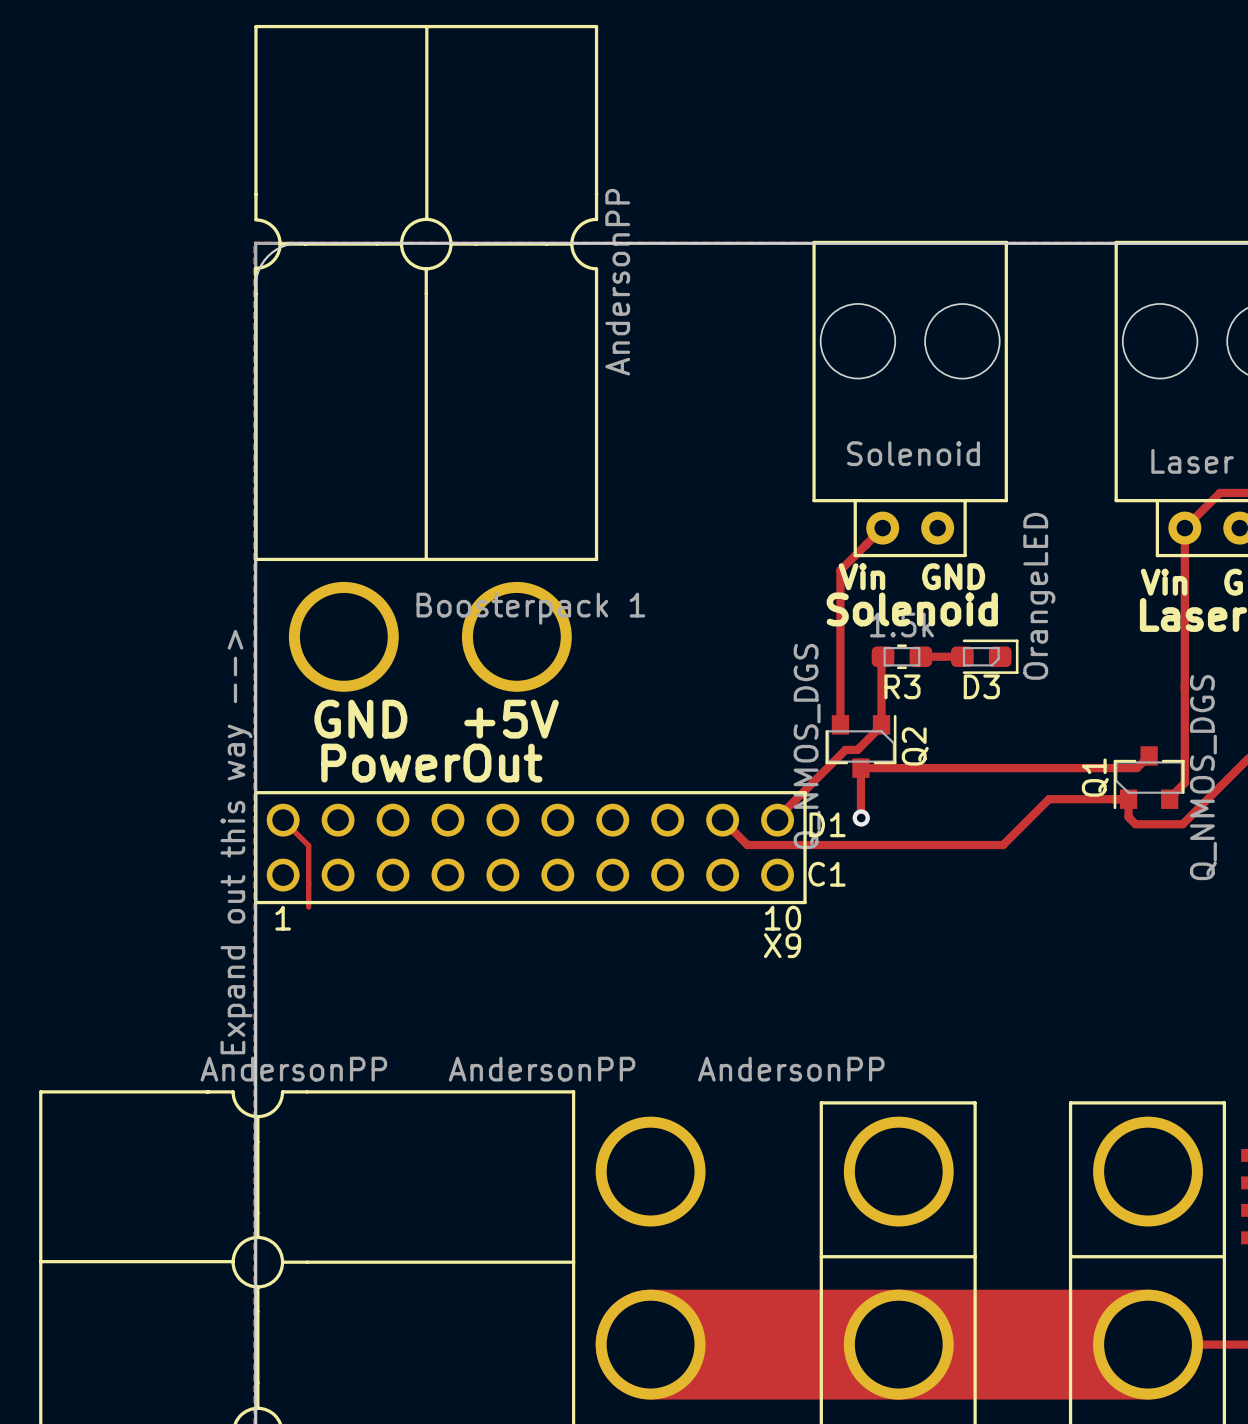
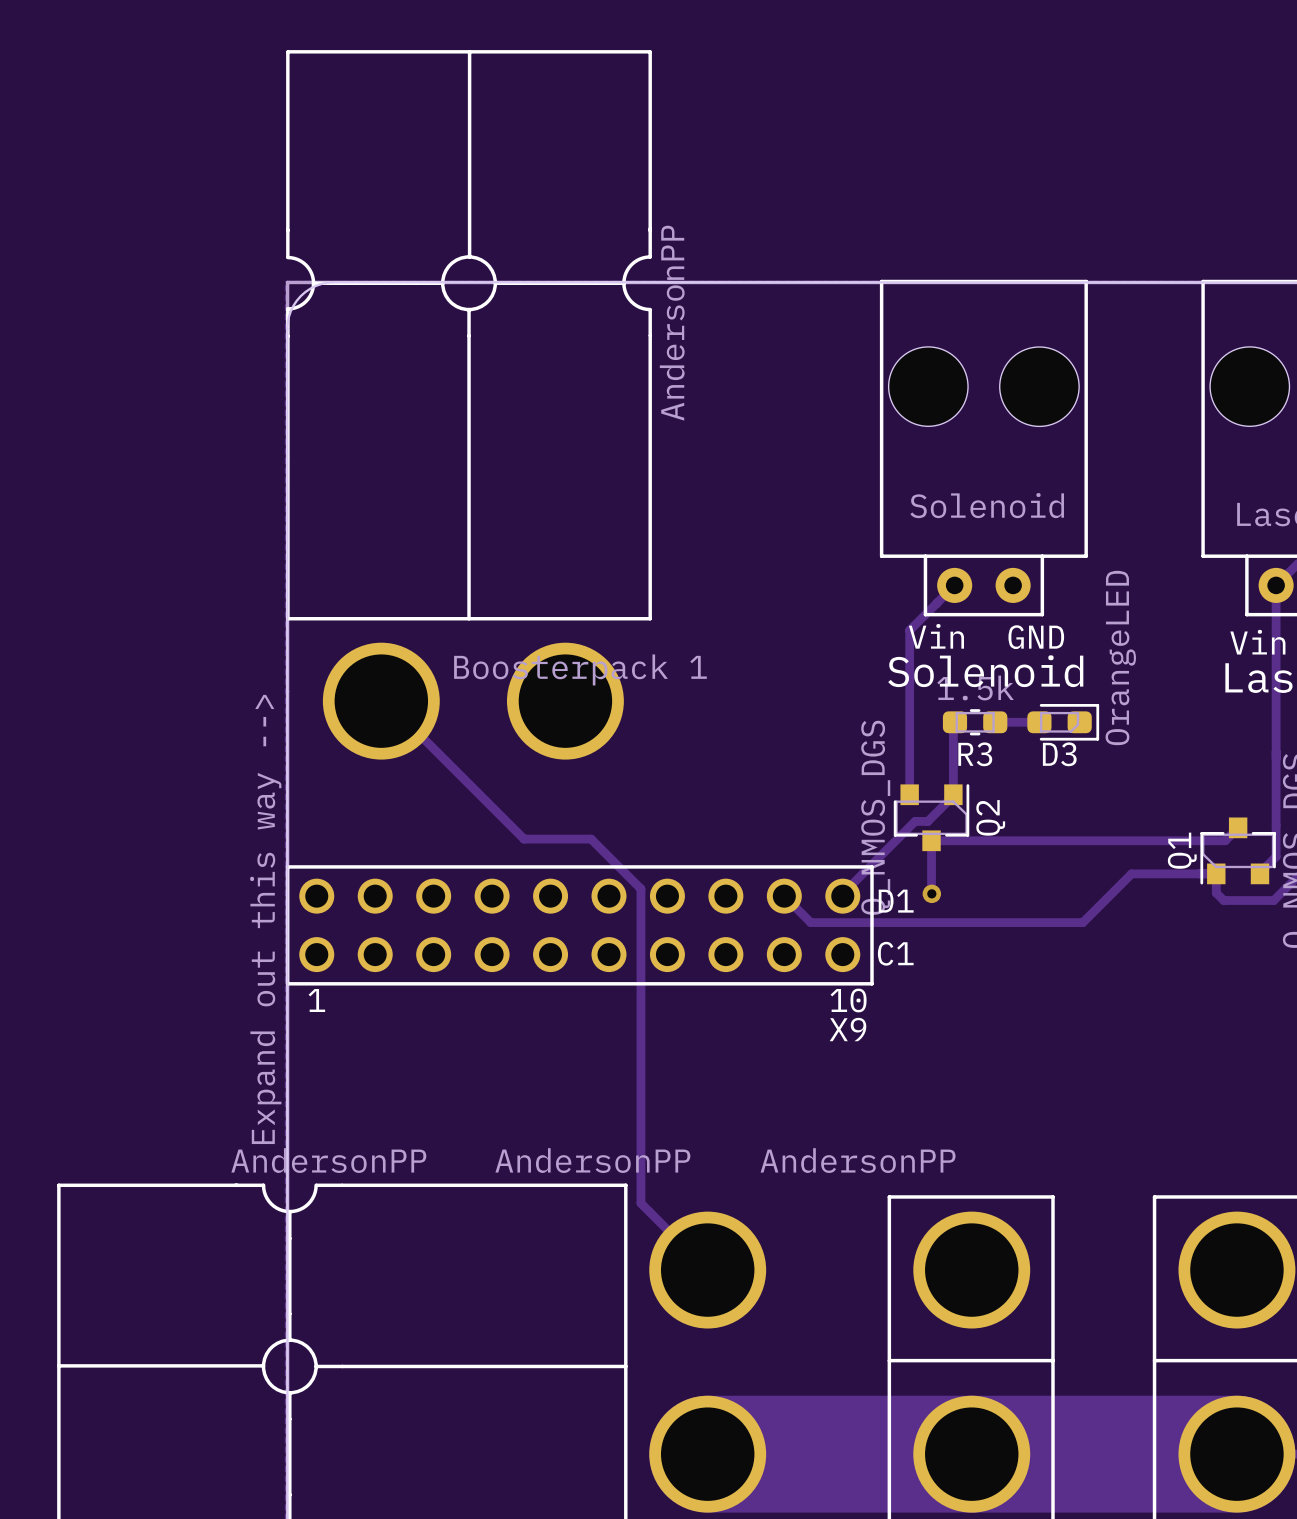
track: none -> (385, 700) (524, 839) (591, 839) (640, 888) (640, 1203) (707, 1270)
text: GND +5V (436, 719) -> none
text: PowerOut (431, 763) -> none
track: (283, 820) (308, 845) (308, 907) -> none

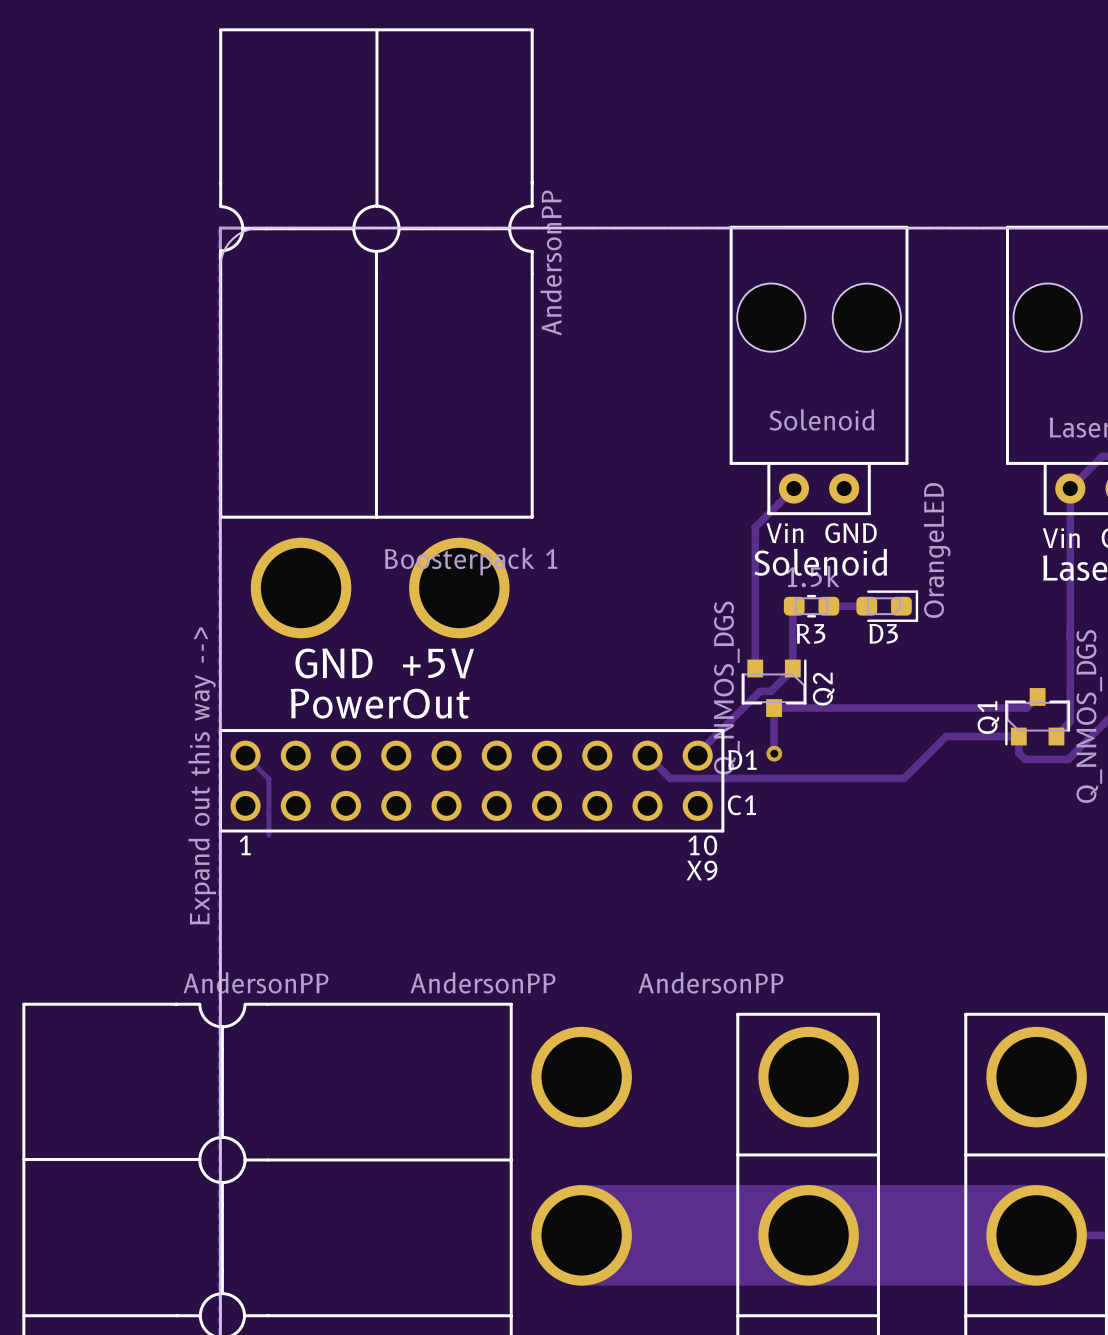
track: (385, 700) (524, 839) (591, 839) (640, 888) (640, 1203) (707, 1270) -> none
text: none -> GND +5V (384, 663)
text: none -> PowerOut (380, 703)
track: none -> (245, 755) (268, 779) (268, 835)

